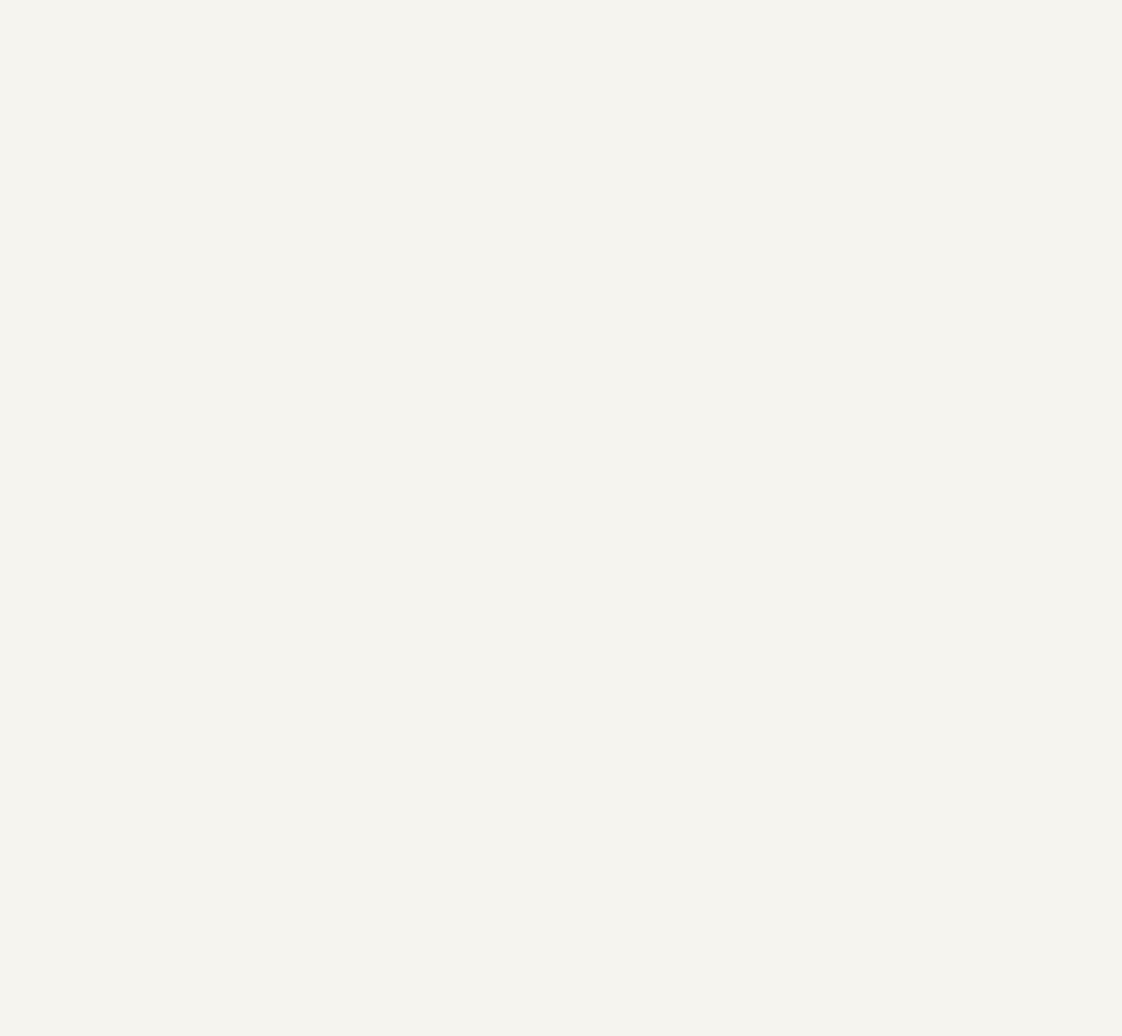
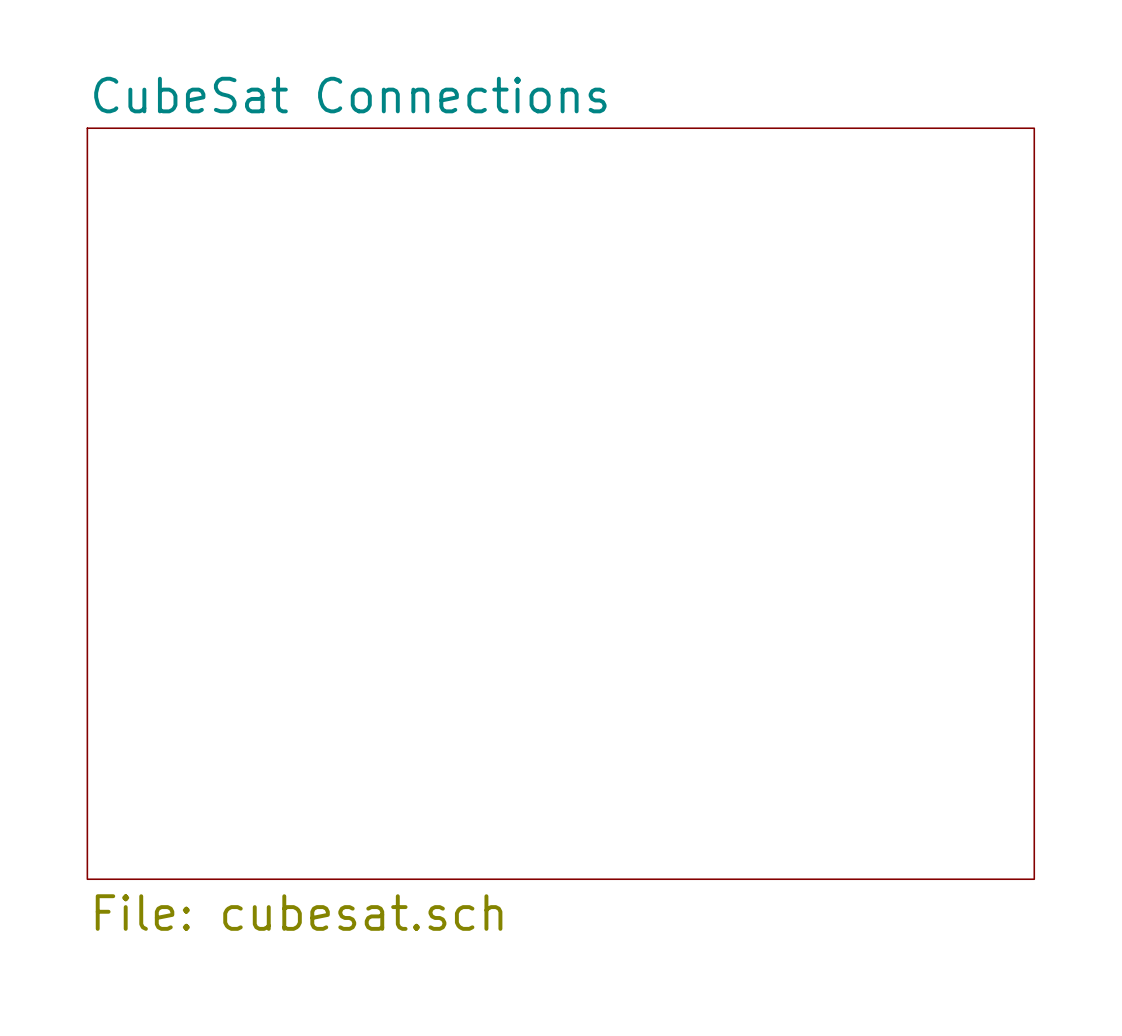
sheet CubeSat Connections: none -> File: cubesat.sch (560, 503)

